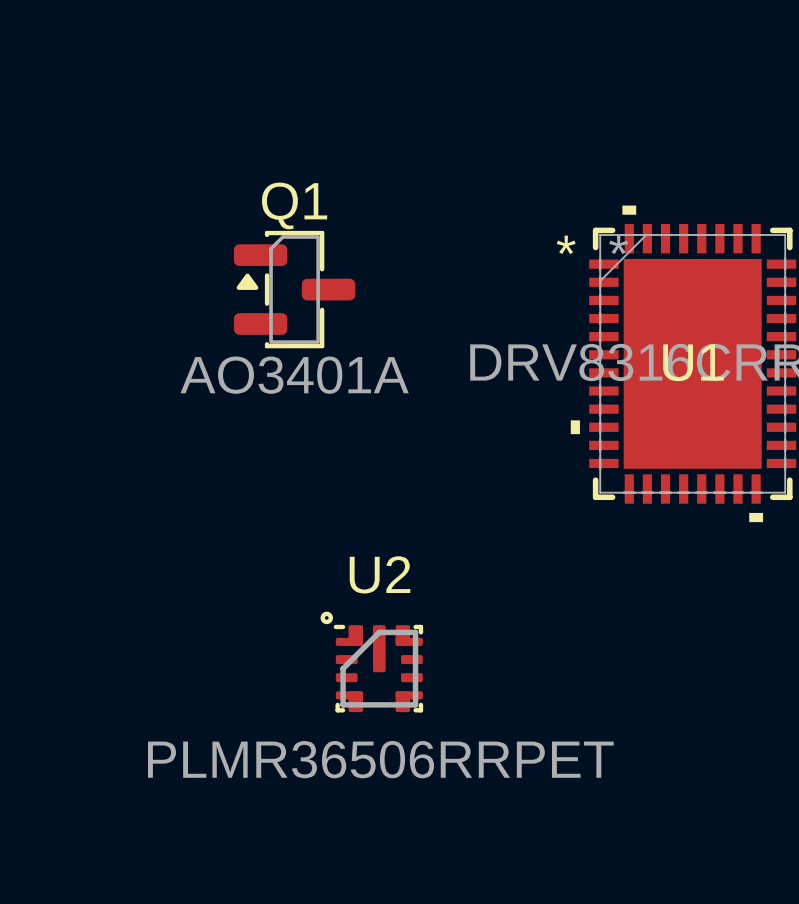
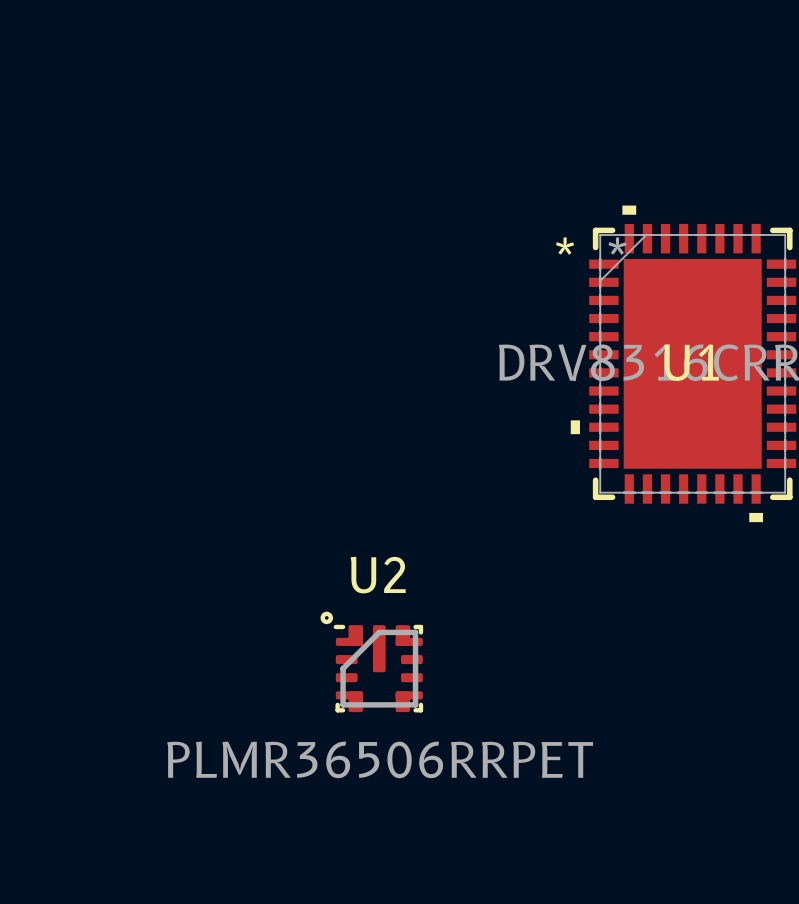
Q1: AO3401A (294, 289) -> none

